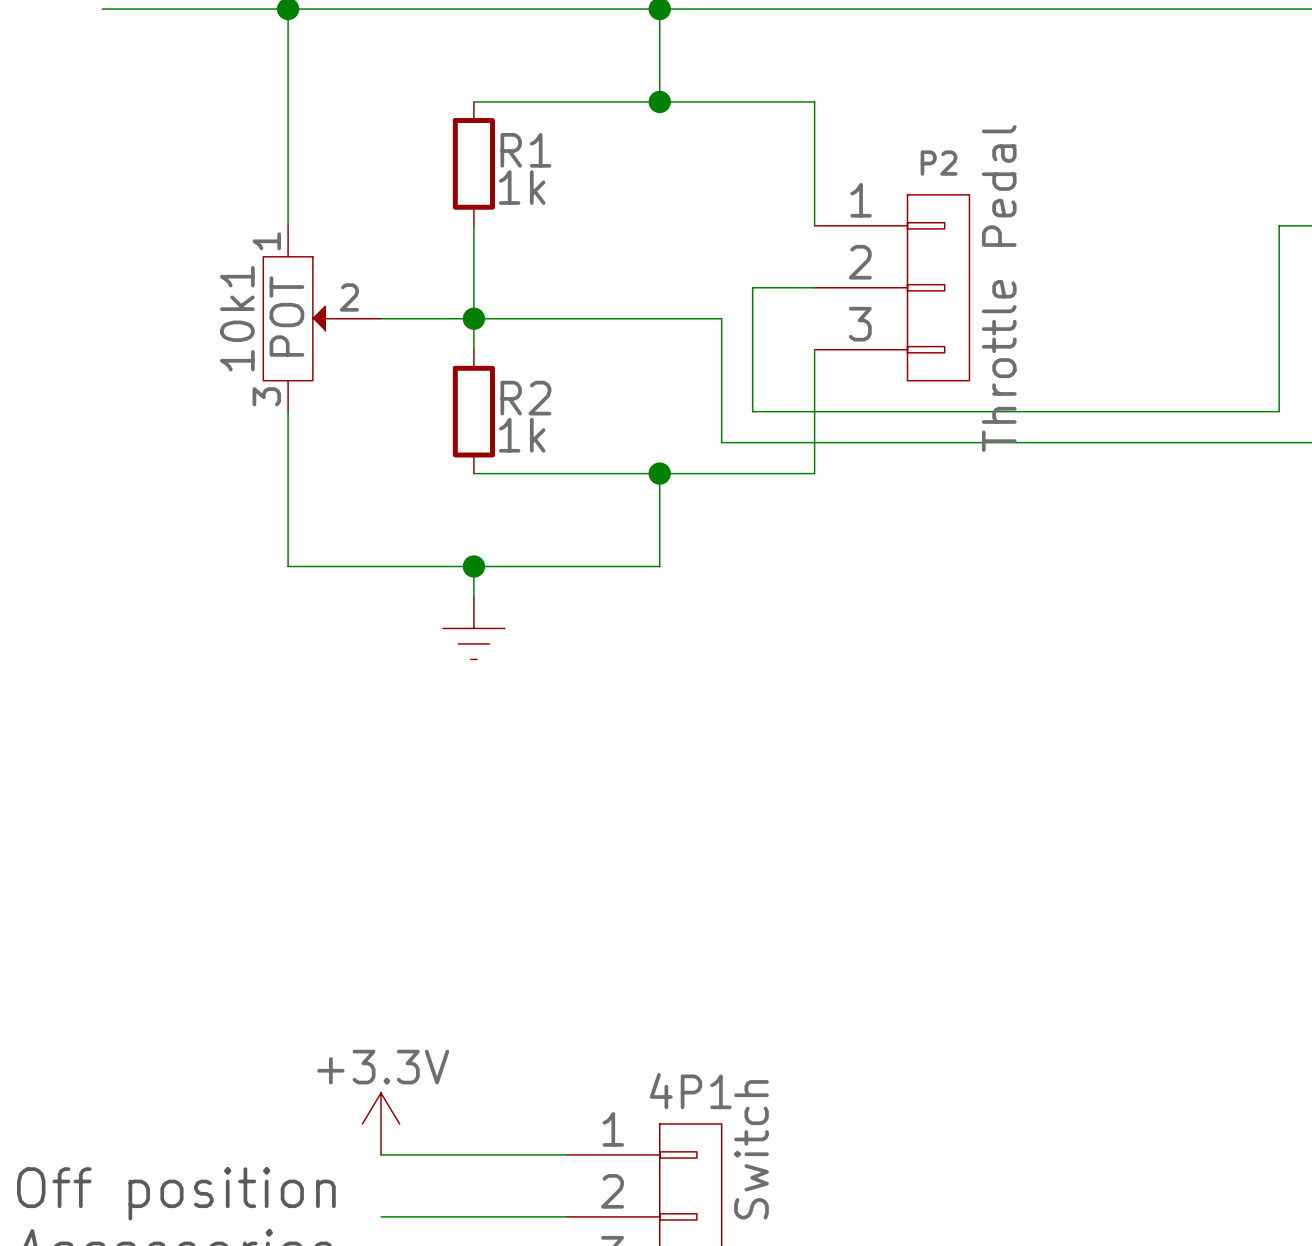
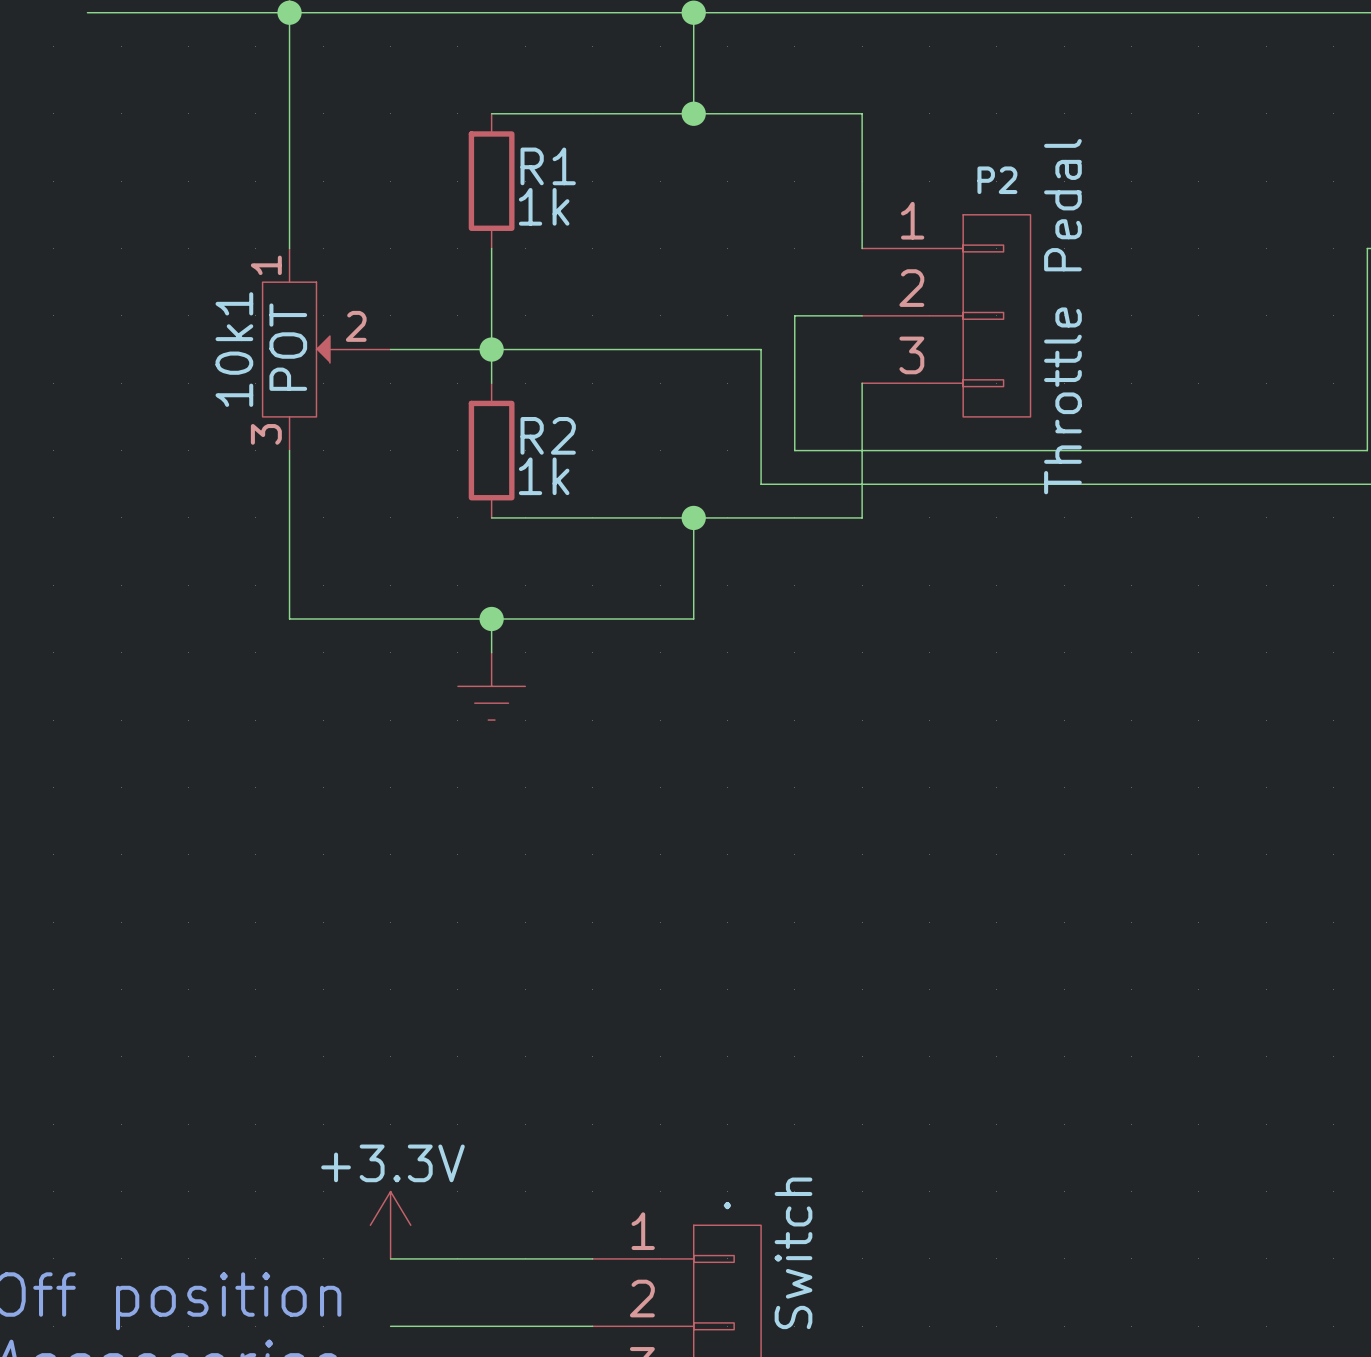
4P1 name: 4P1 (690, 1091) -> . (727, 1205)

